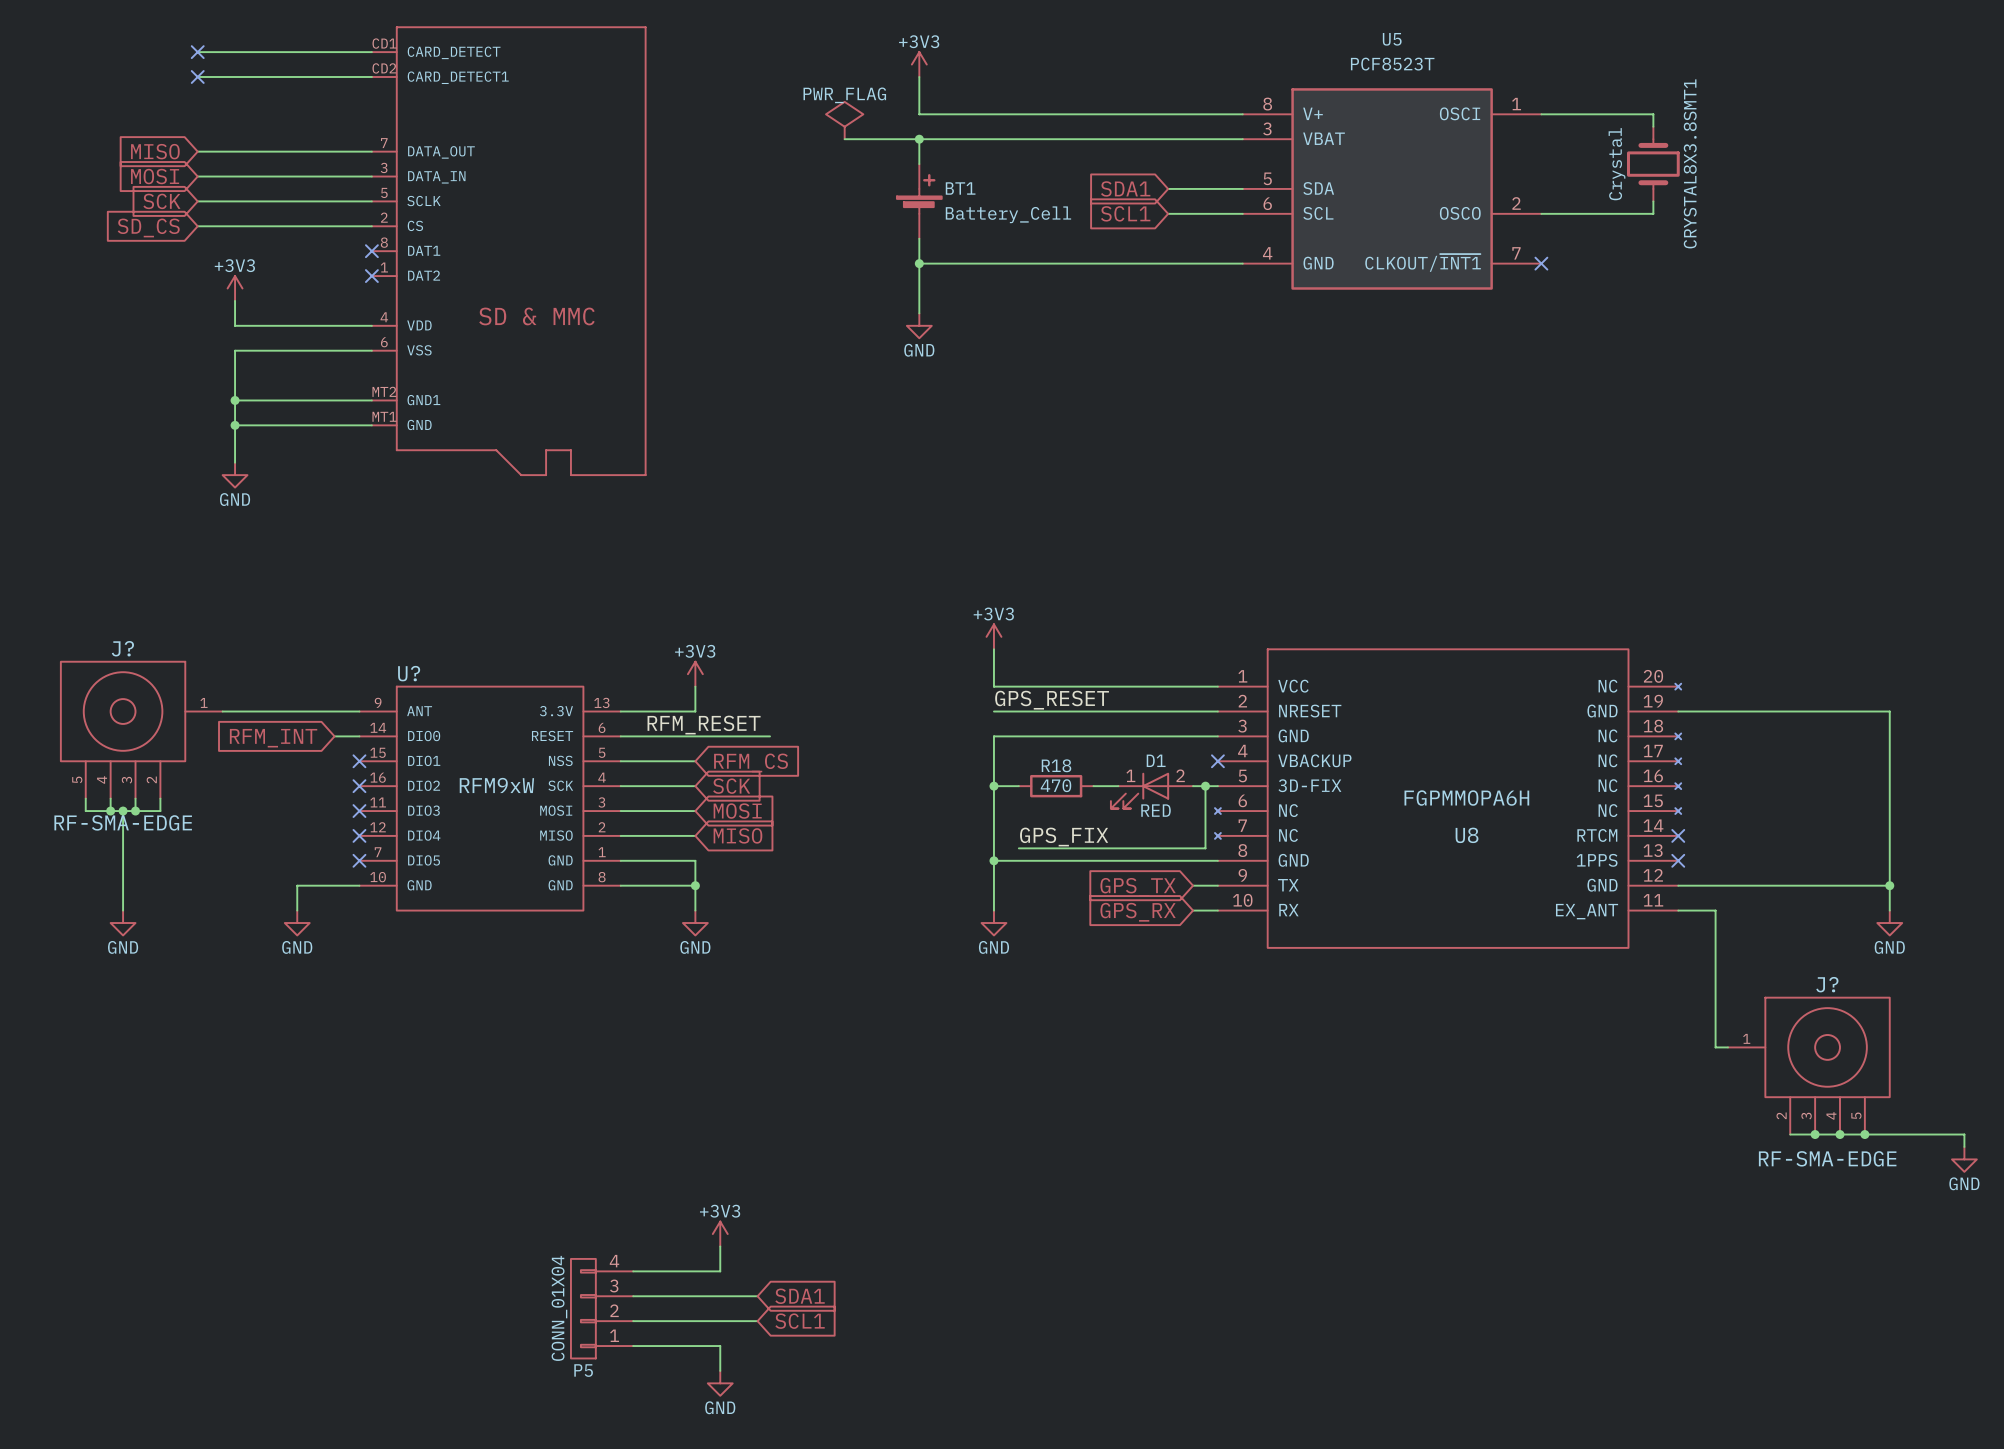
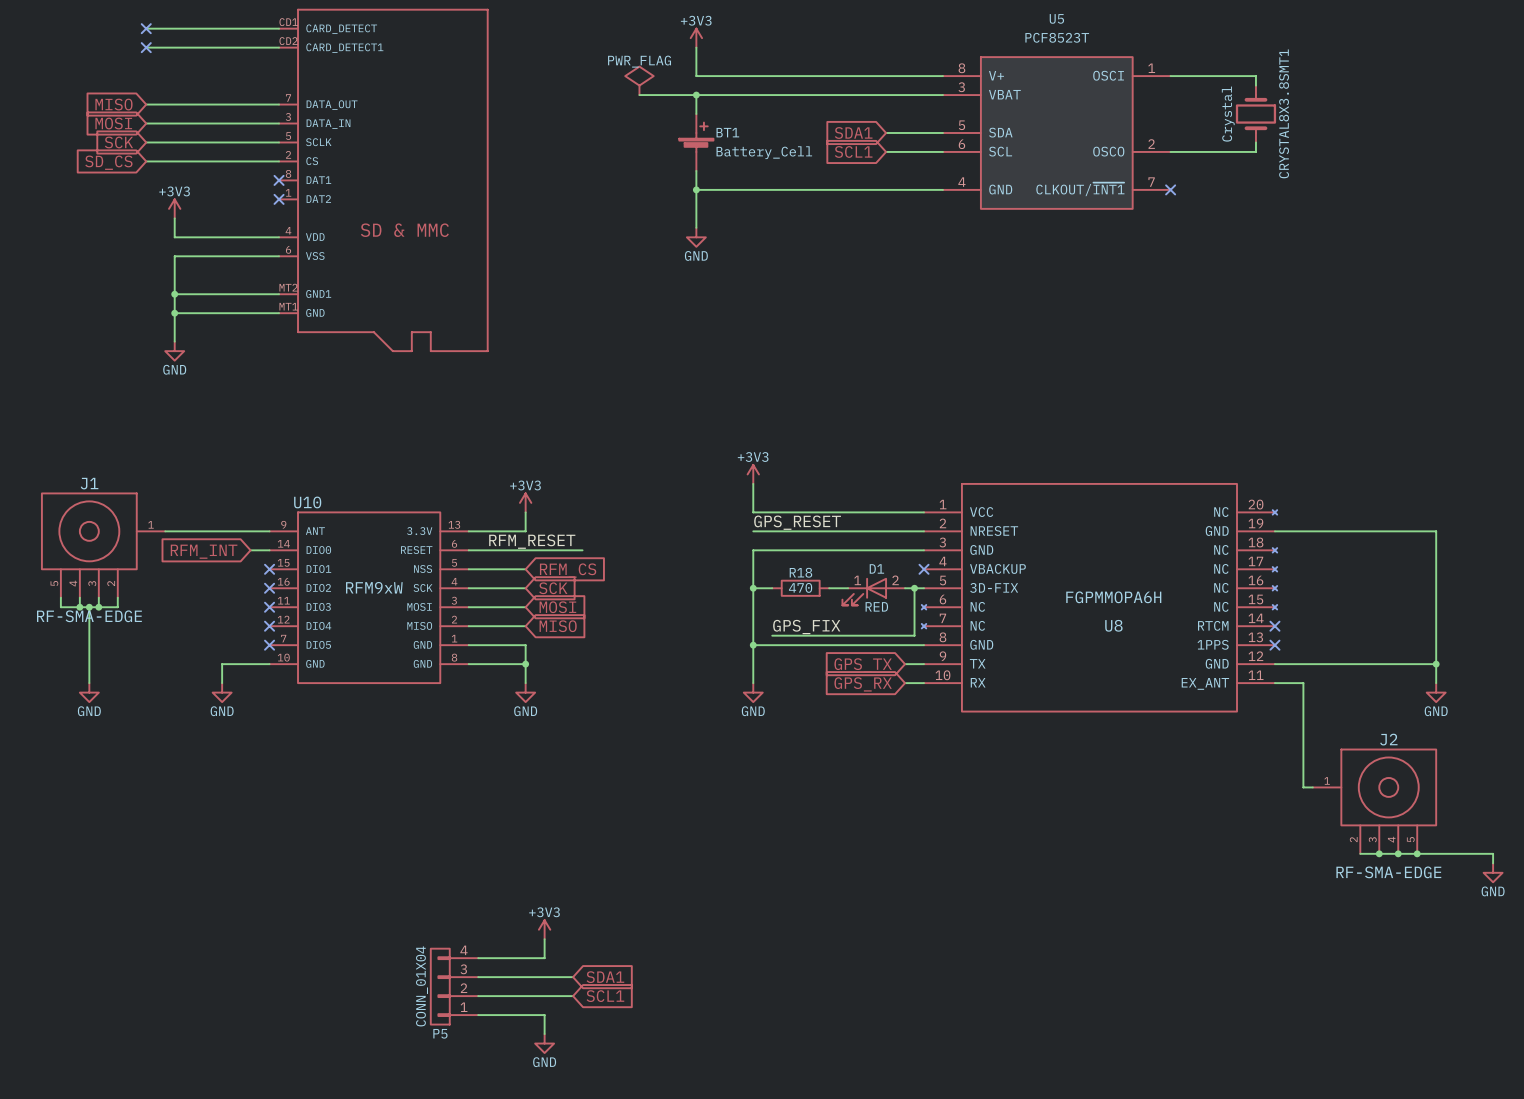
J? name: J? (122, 648) -> J1 (89, 483)
U? name: U? (409, 673) -> U10 (307, 502)
J? name: J? (1827, 984) -> J2 (1388, 739)

